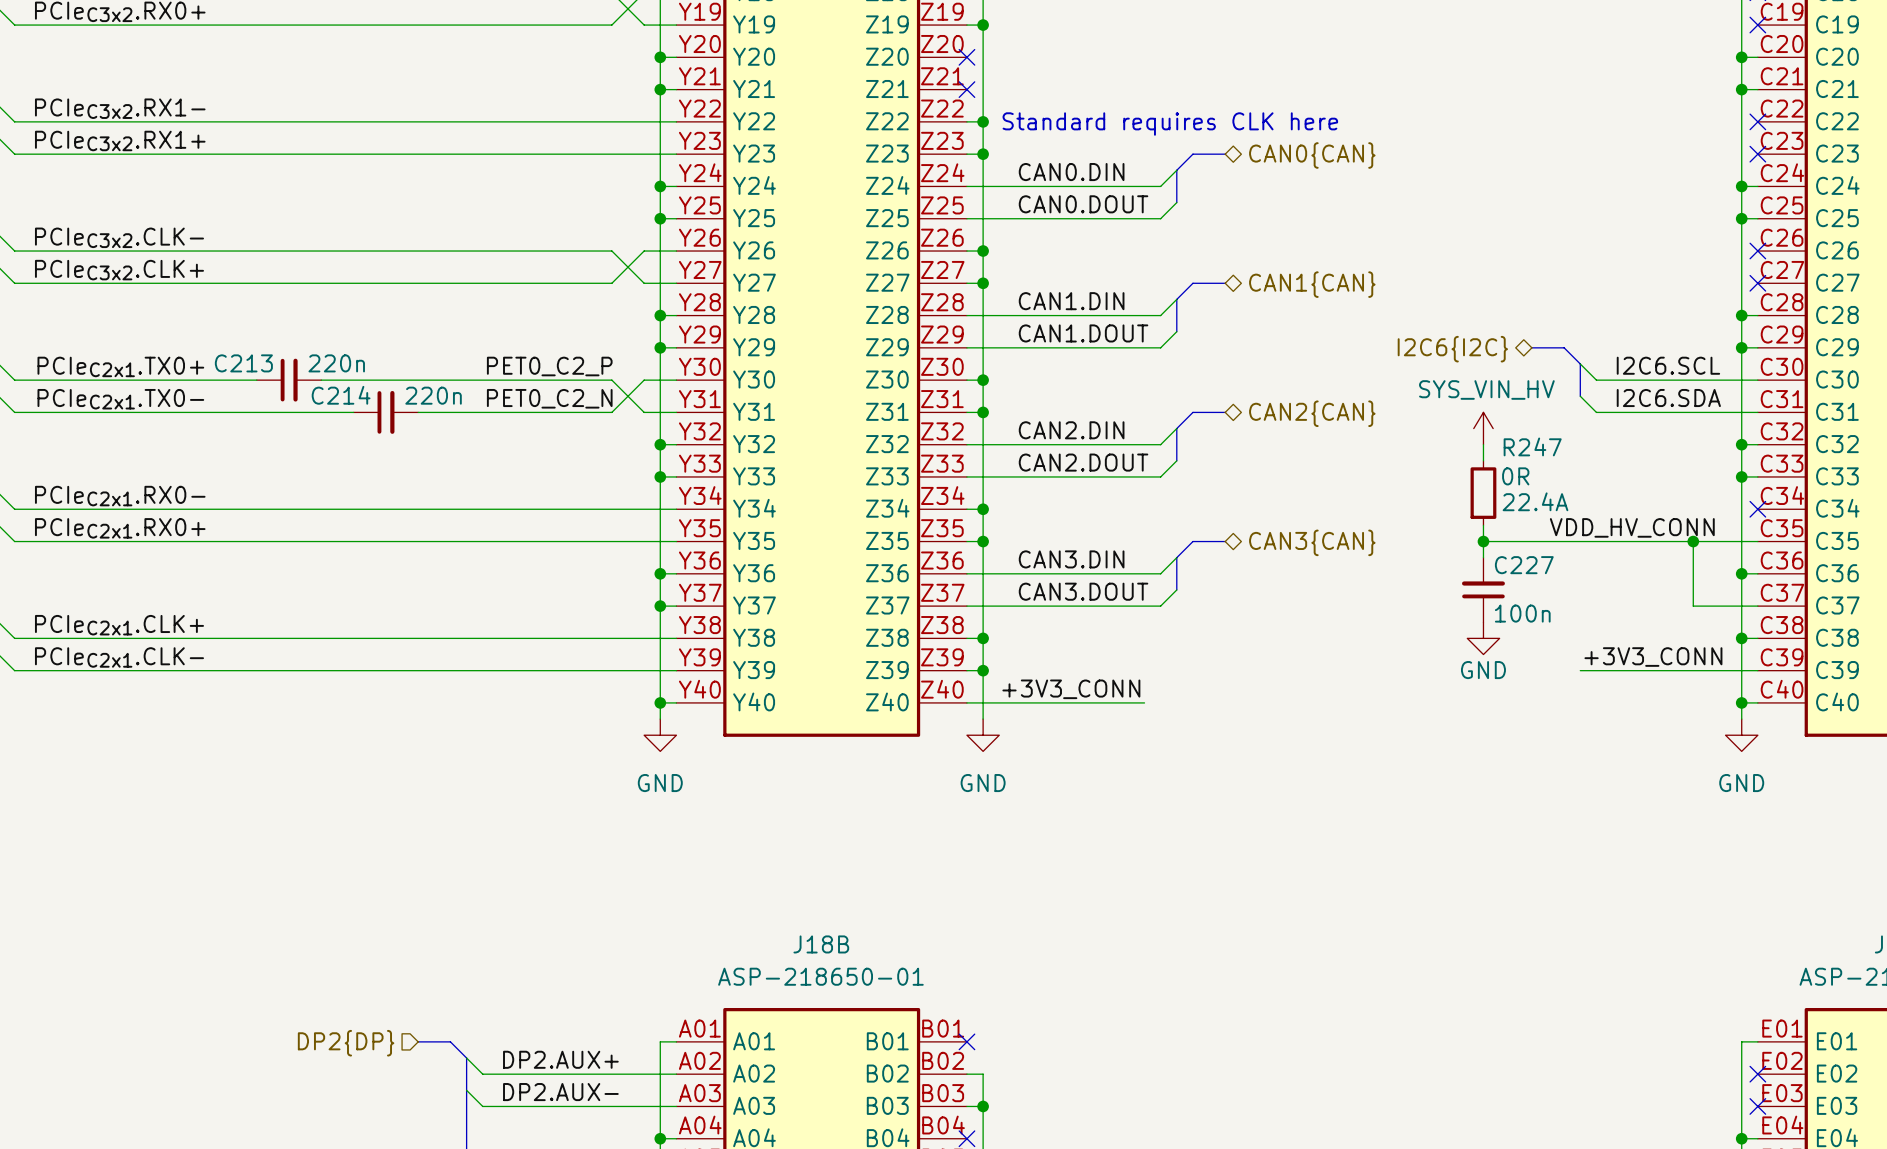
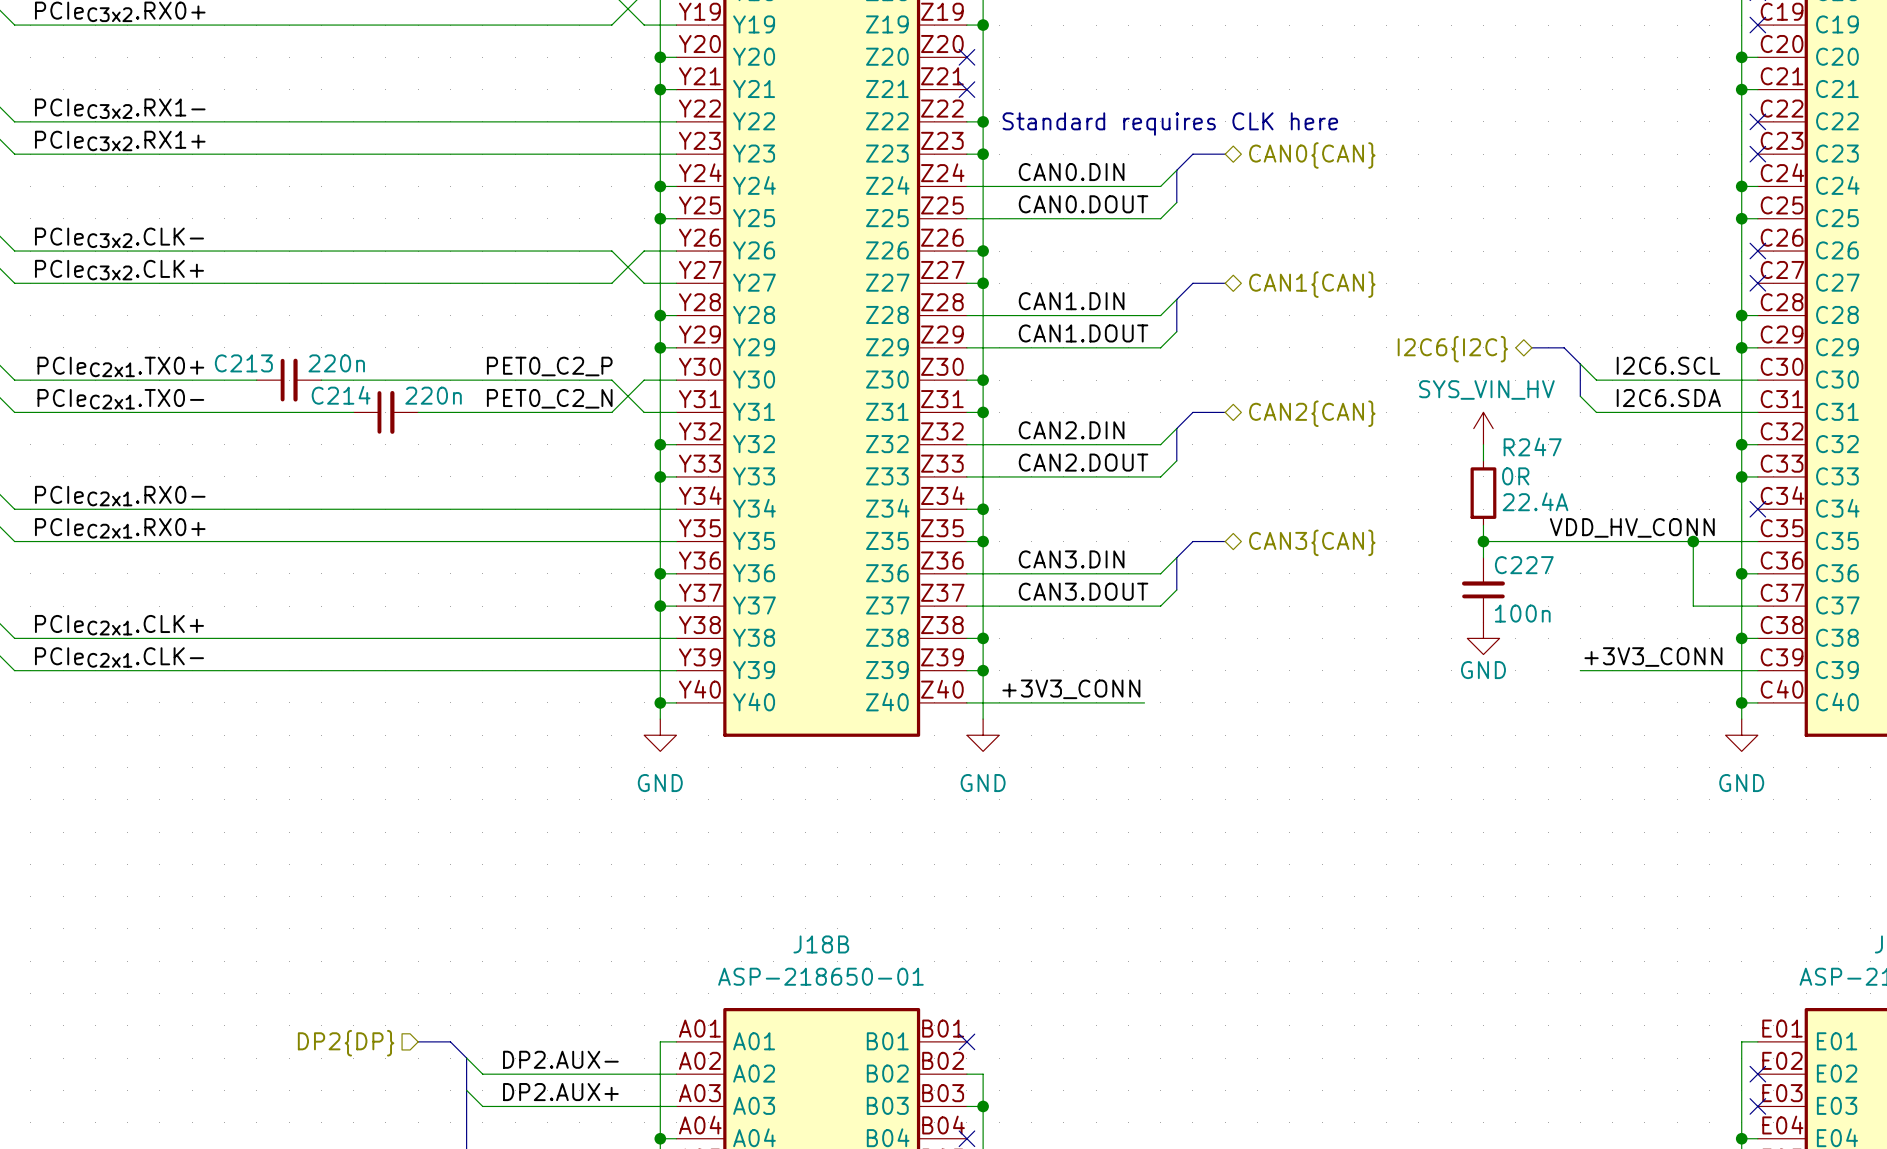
label: DP2.AUX+ (560, 1059) -> DP2.AUX- (560, 1059)
label: DP2.AUX- (560, 1092) -> DP2.AUX+ (560, 1092)

